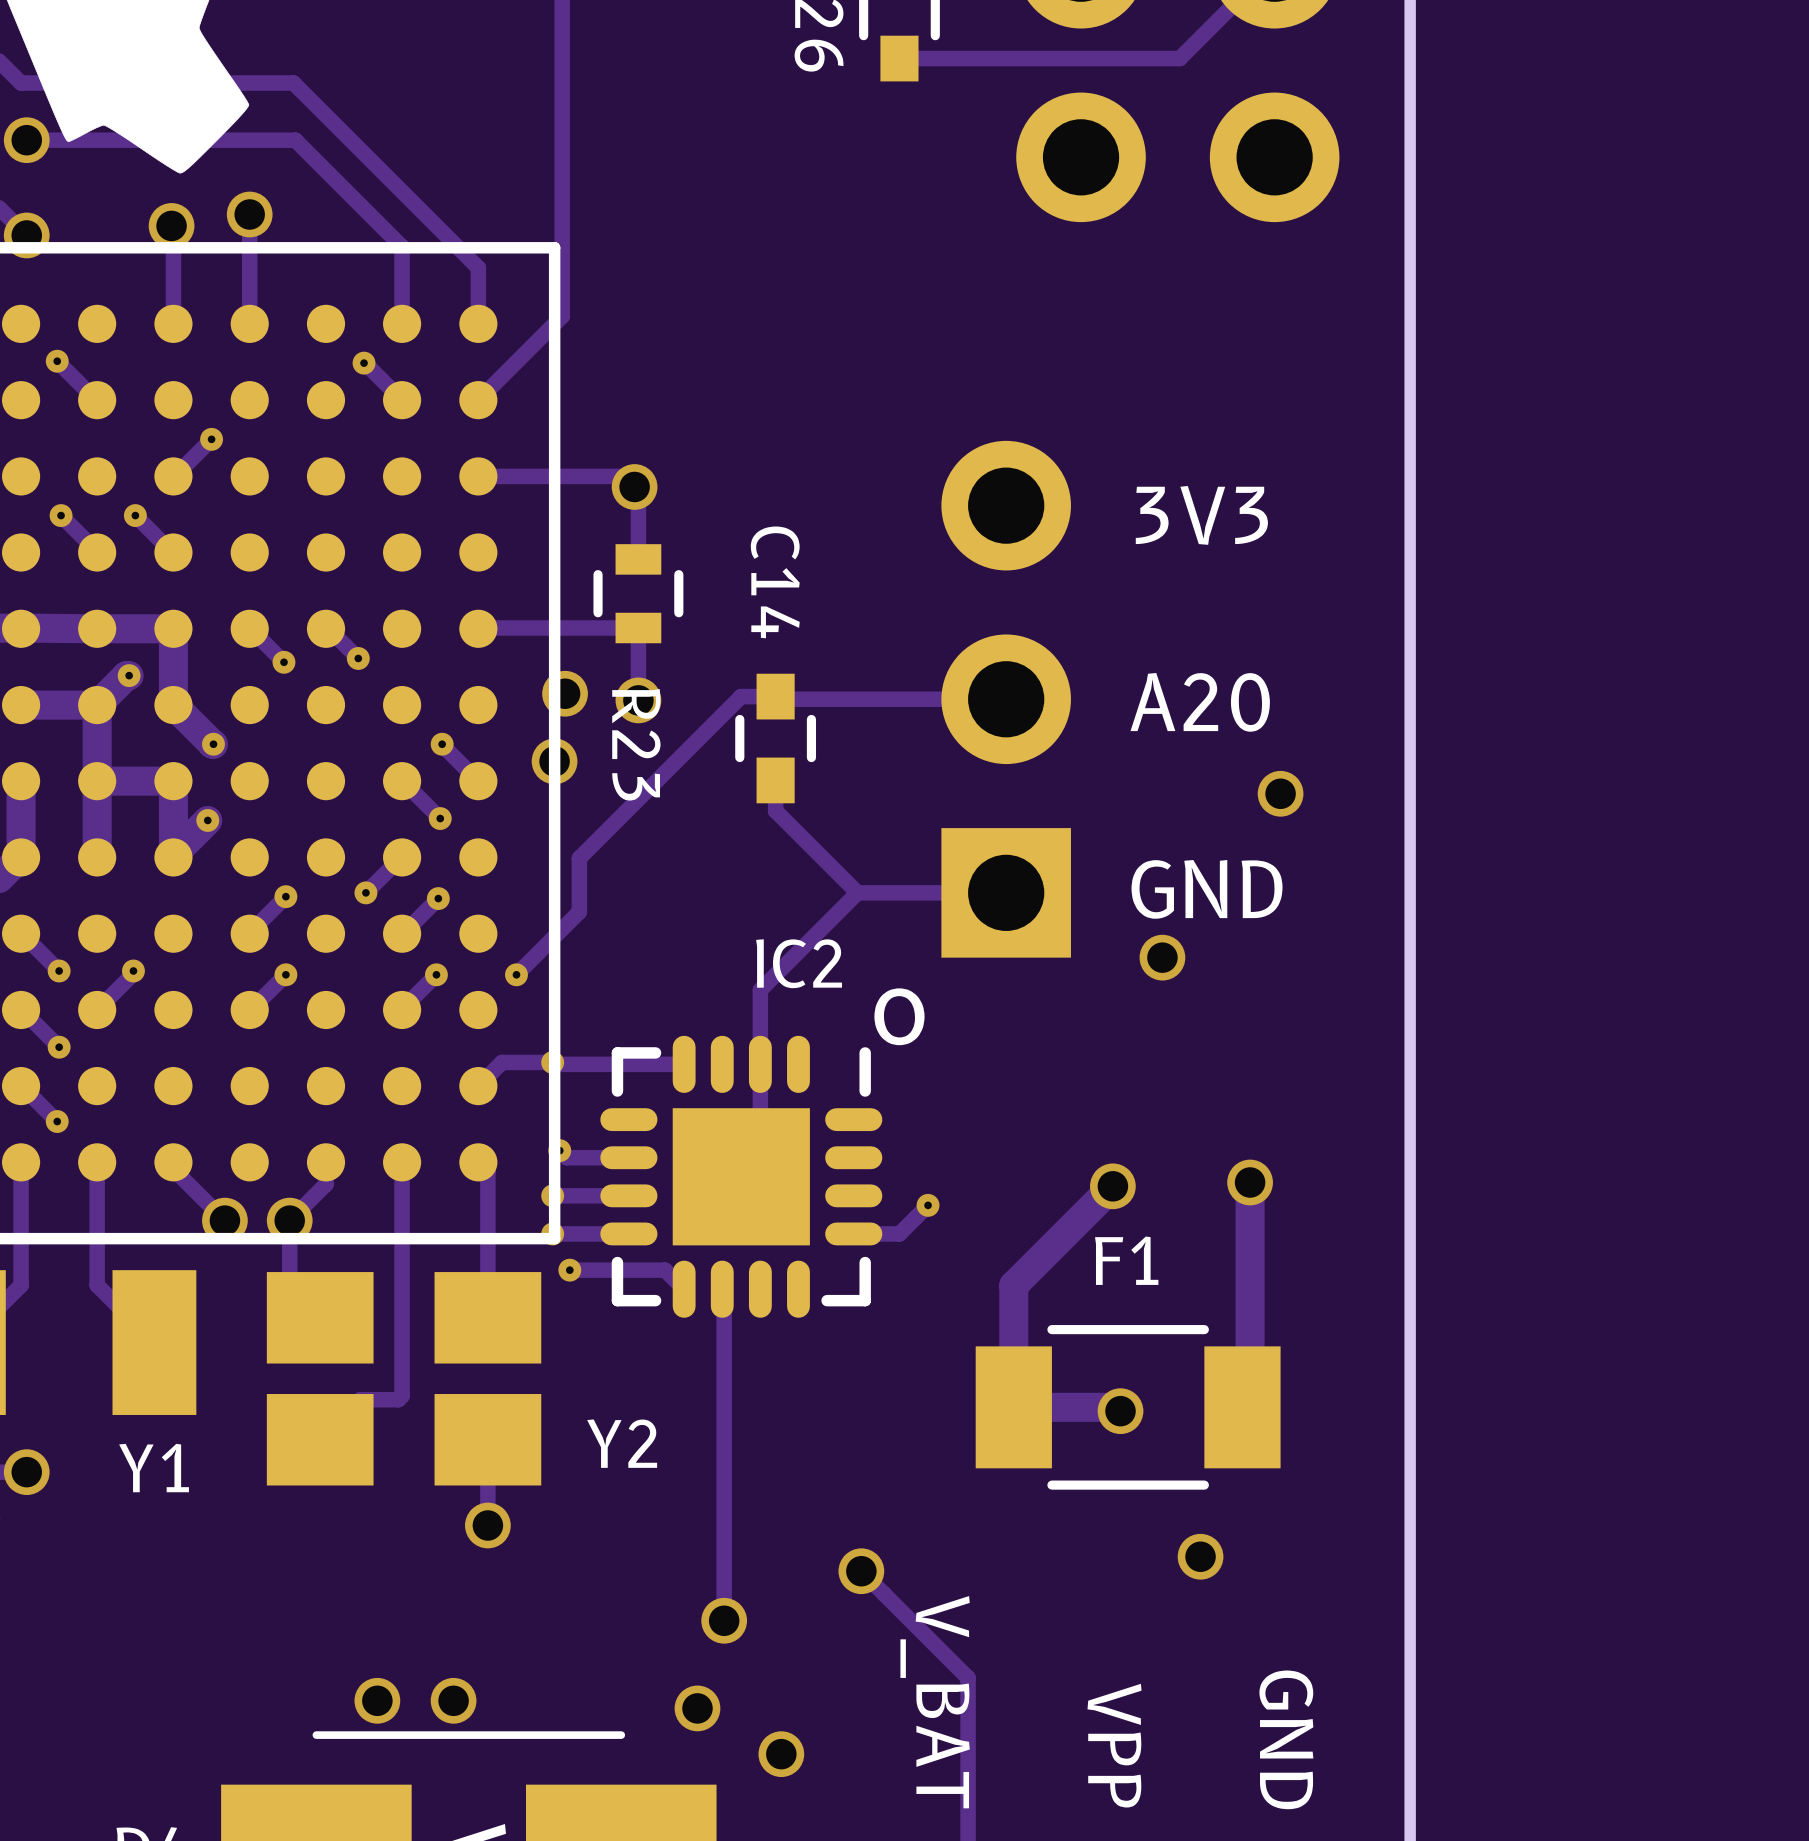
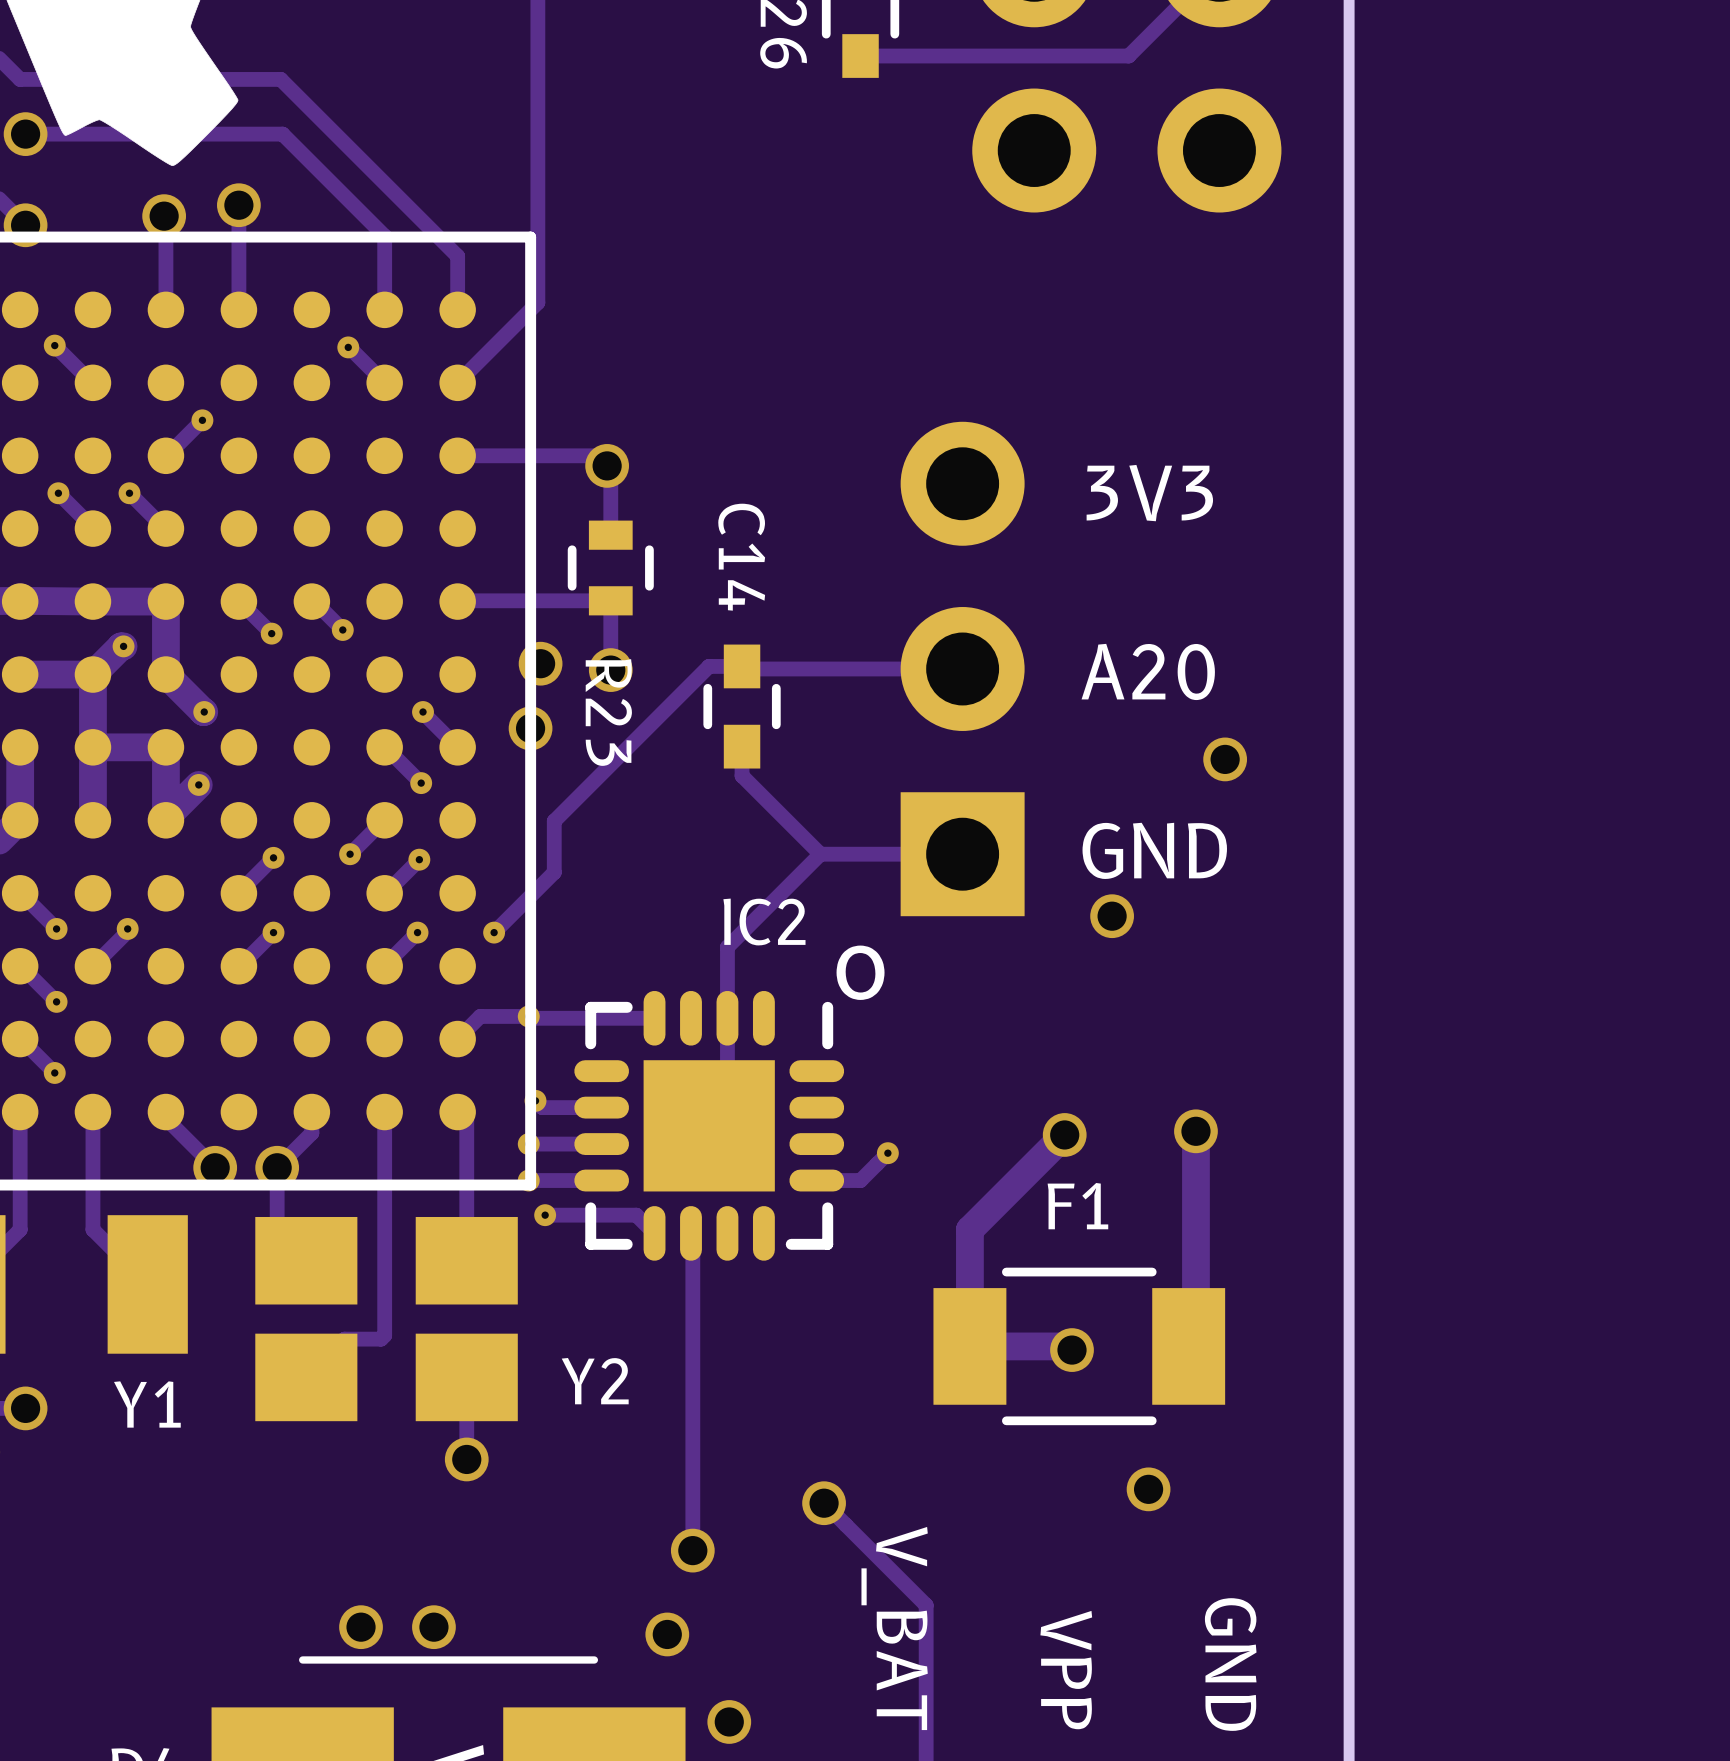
via position: (781, 1754) -> (729, 1721)

